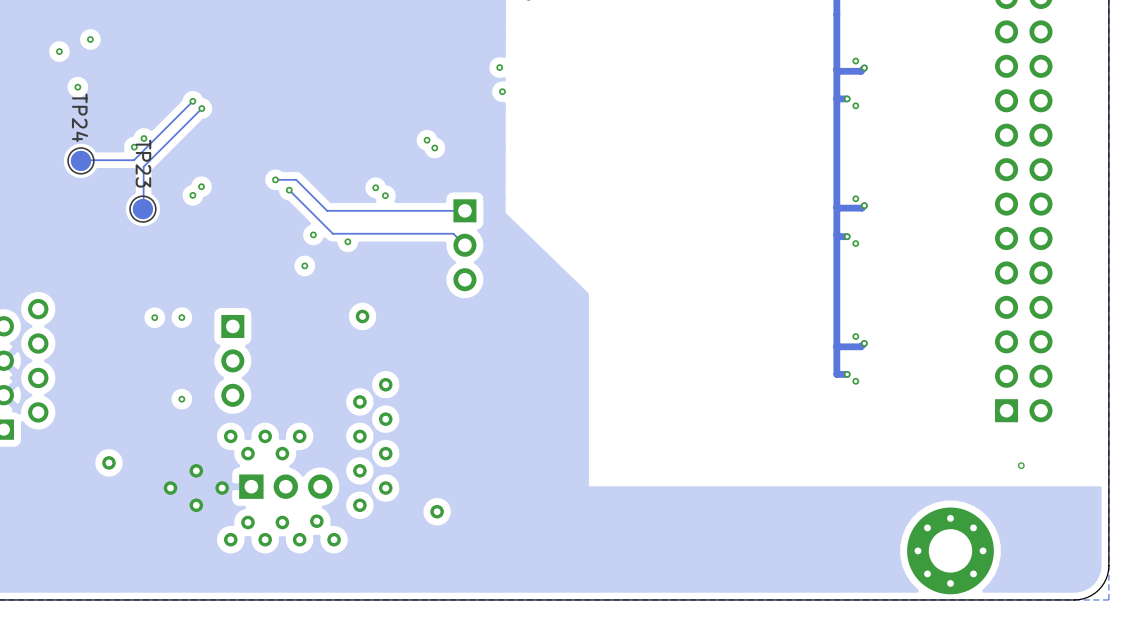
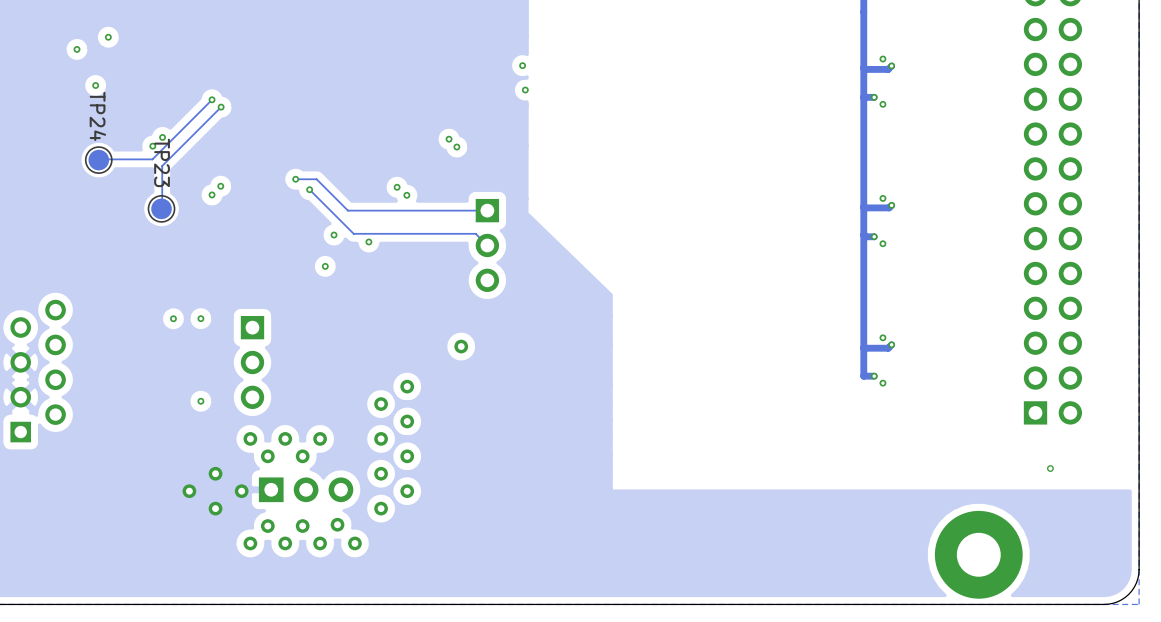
via: (362, 316) -> none
via: none -> (461, 346)
via: (109, 462) -> none
part footprint: [907, 507, 994, 595] -> [934, 510, 1023, 599]
via: (437, 511) -> none

